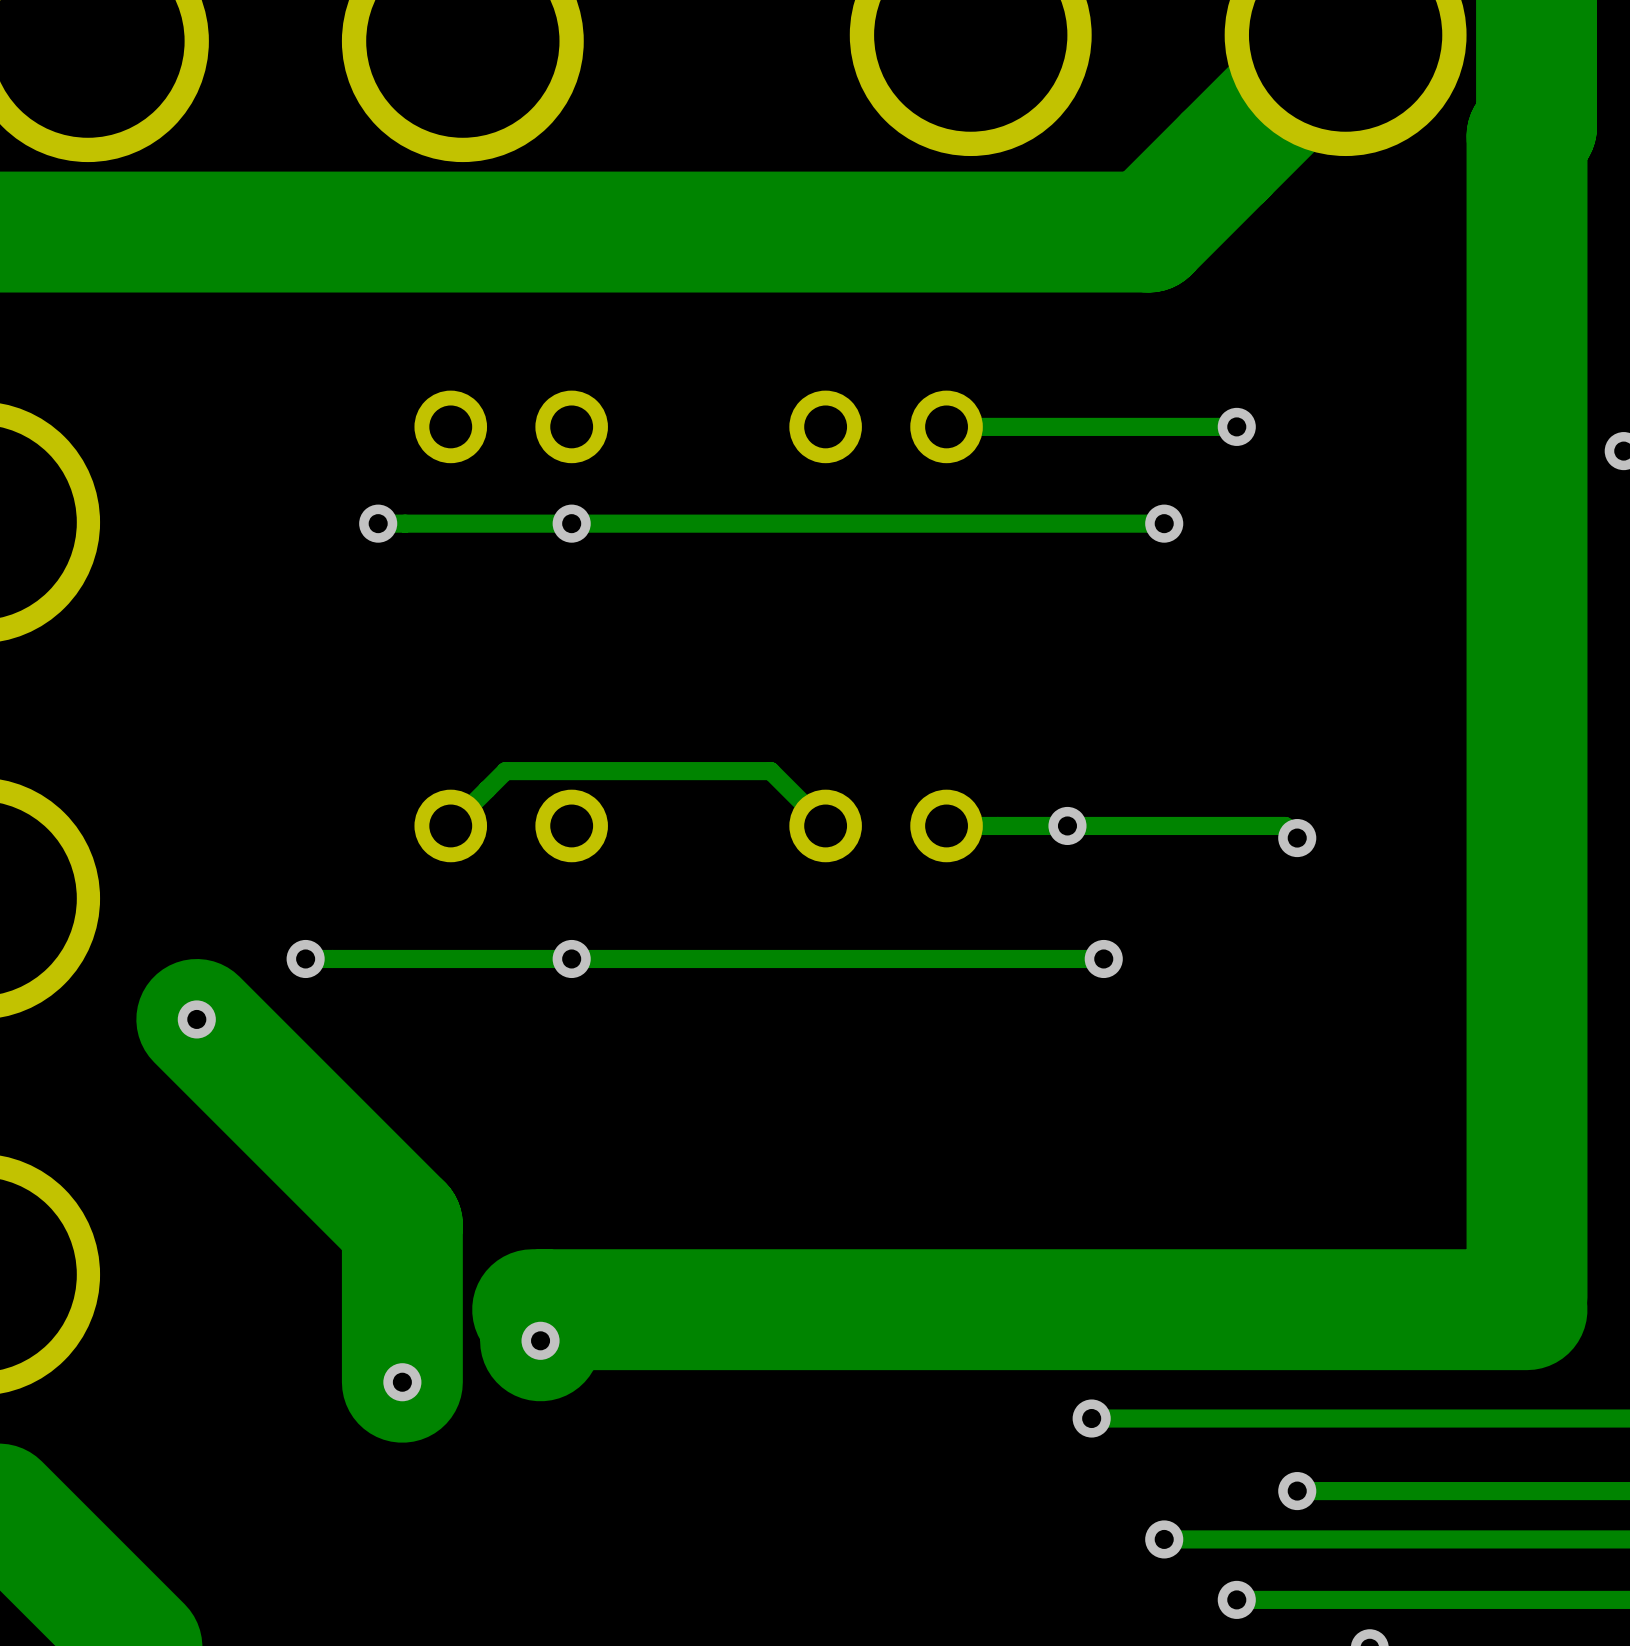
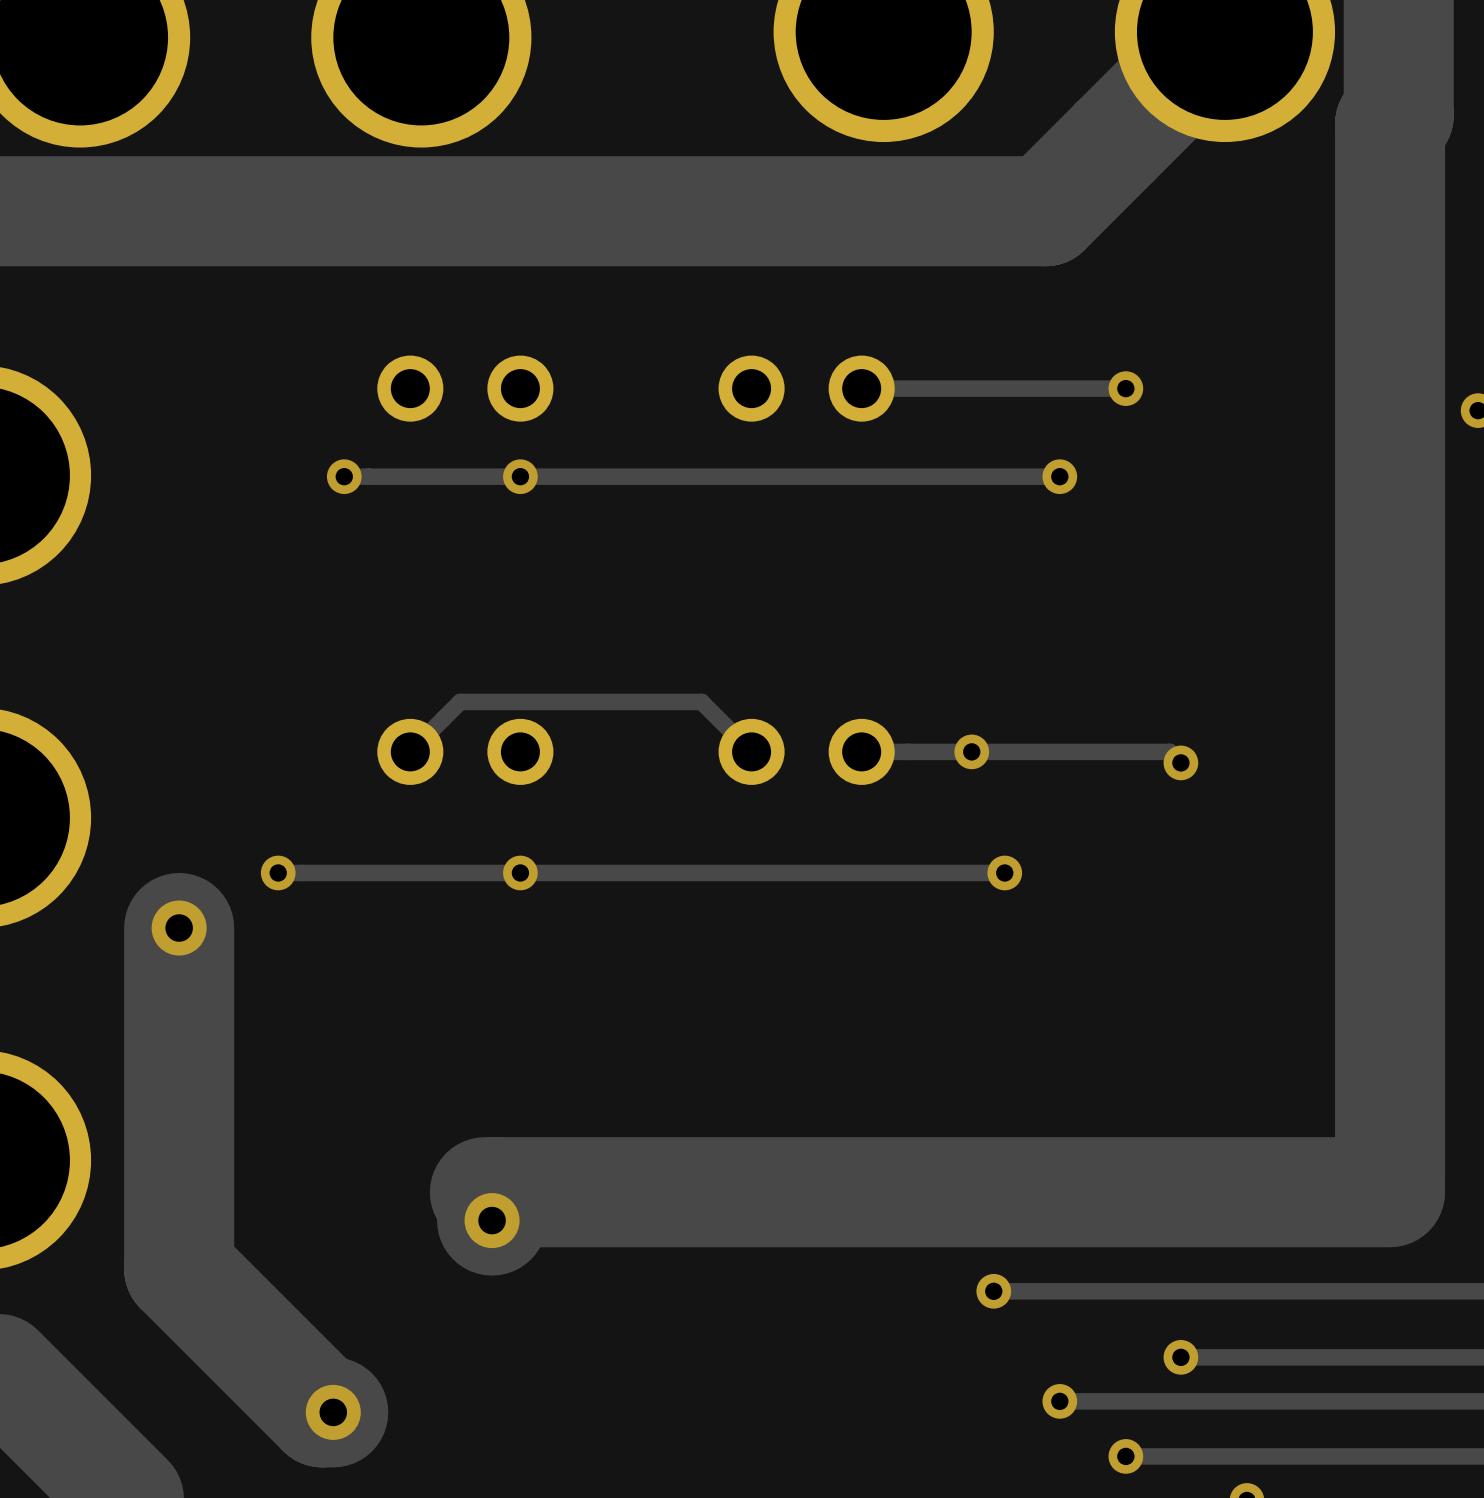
via size: [177, 1000, 216, 1039] -> [151, 900, 207, 956]
track: (196, 1019) (402, 1225) (402, 1382) -> (179, 928) (179, 1269) (322, 1412) (333, 1412)
via size: [521, 1321, 560, 1360] -> [464, 1193, 520, 1249]
via: (402, 1382) -> none
via: none -> (333, 1412)

